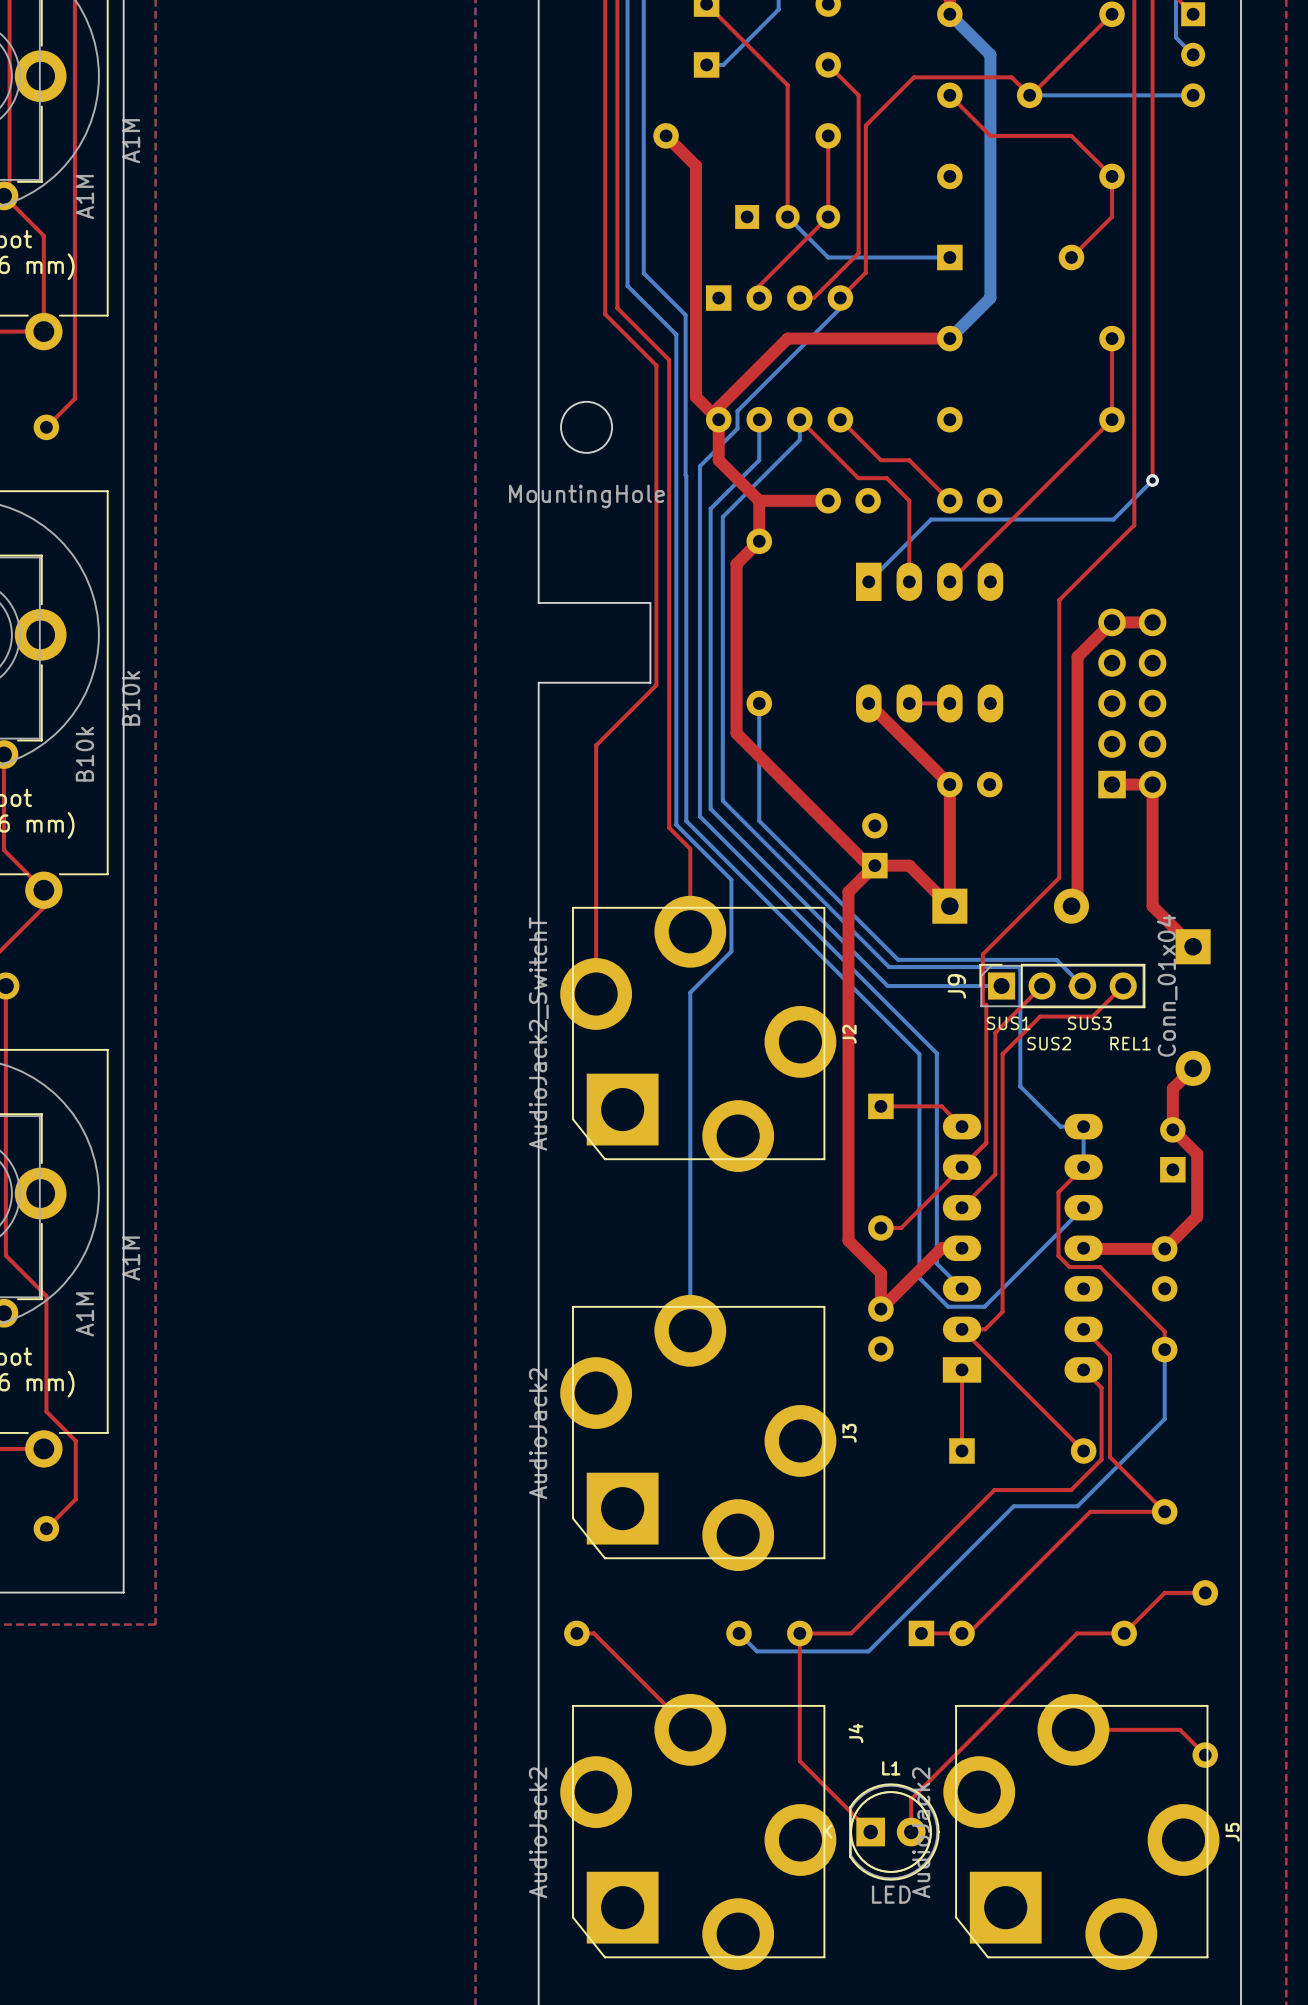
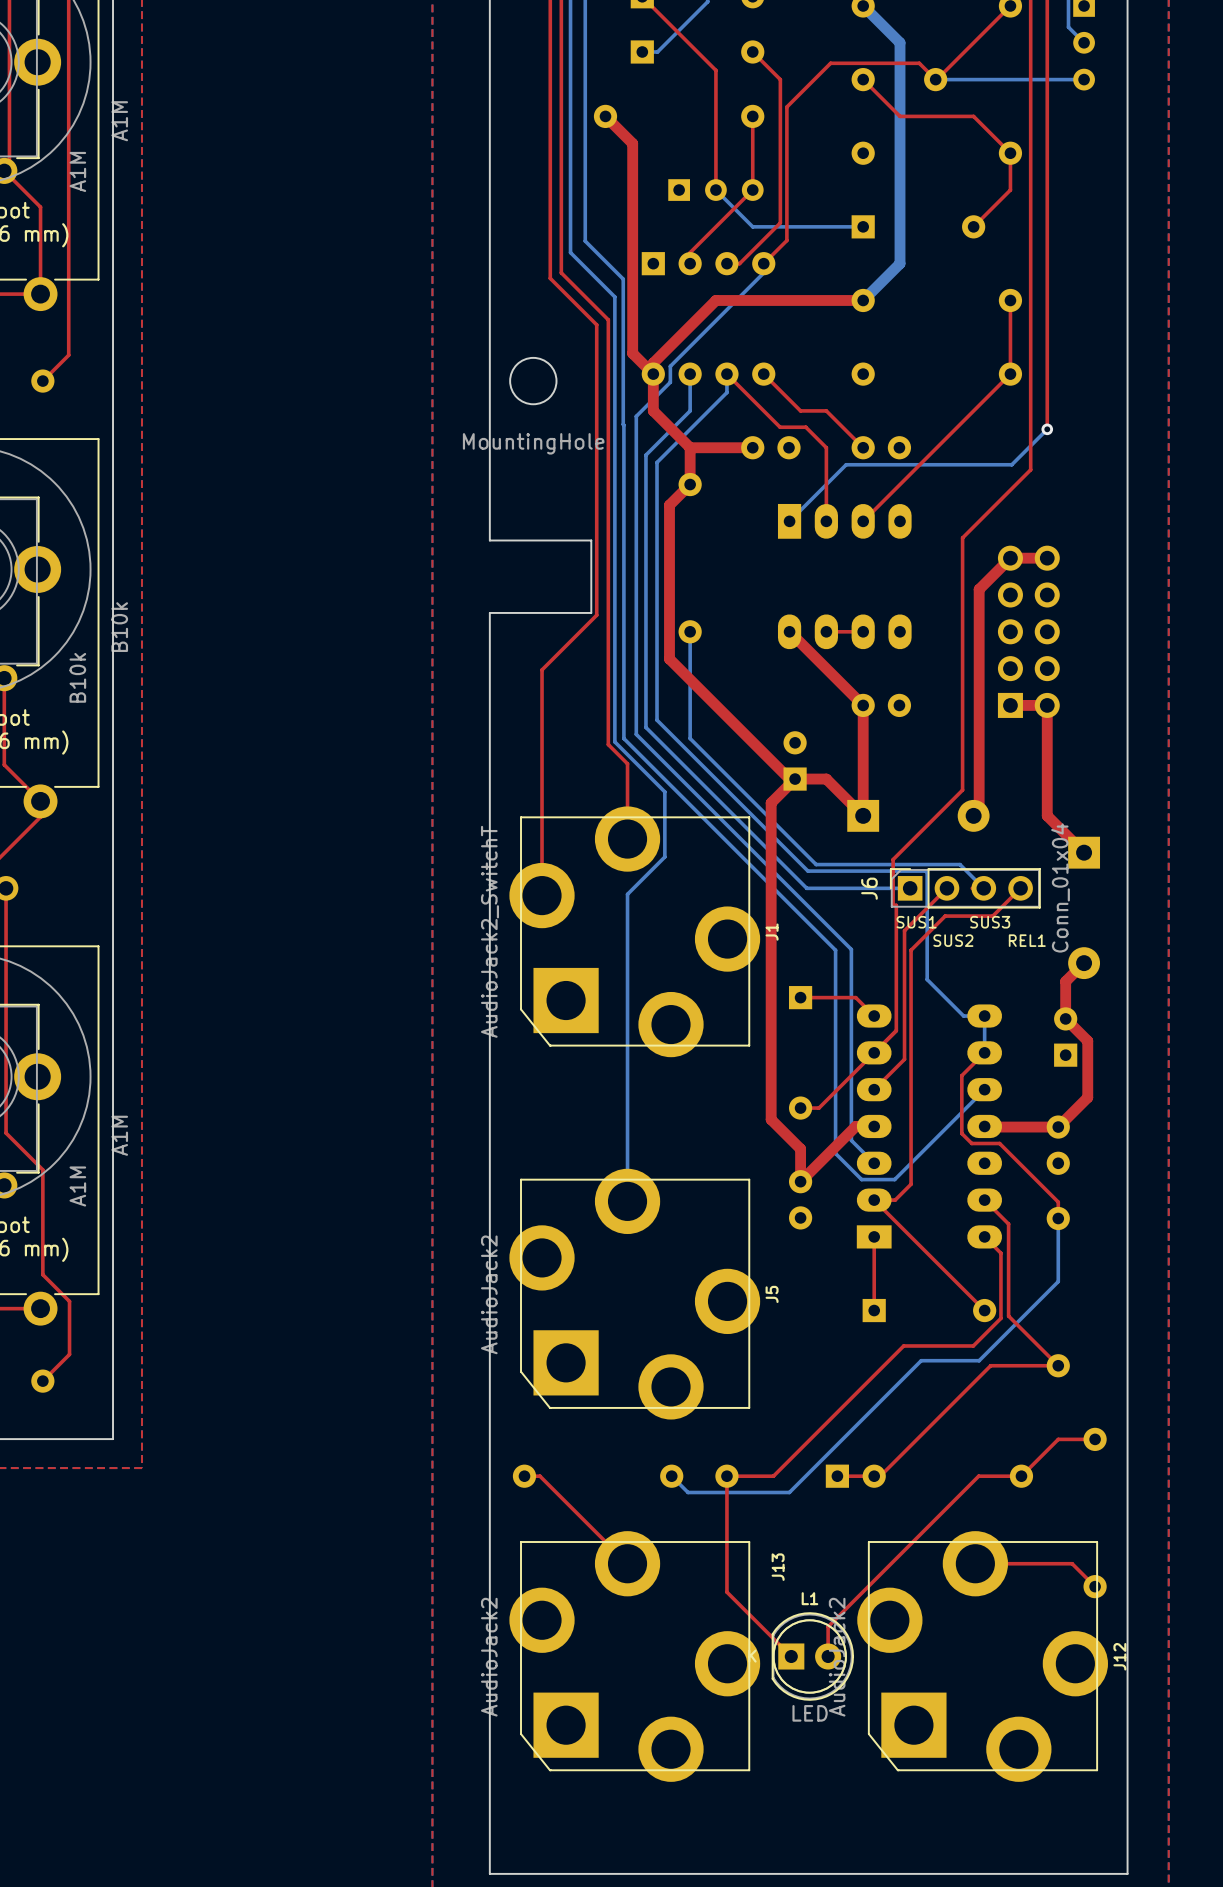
J9 name: J9 (956, 986) -> J6 (869, 888)
J2 name: J2 (849, 1034) -> J1 (772, 932)
J3 name: J3 (849, 1433) -> J5 (772, 1294)
J4 name: J4 (855, 1733) -> J13 (778, 1567)
J5 name: J5 (1232, 1832) -> J12 (1119, 1656)

